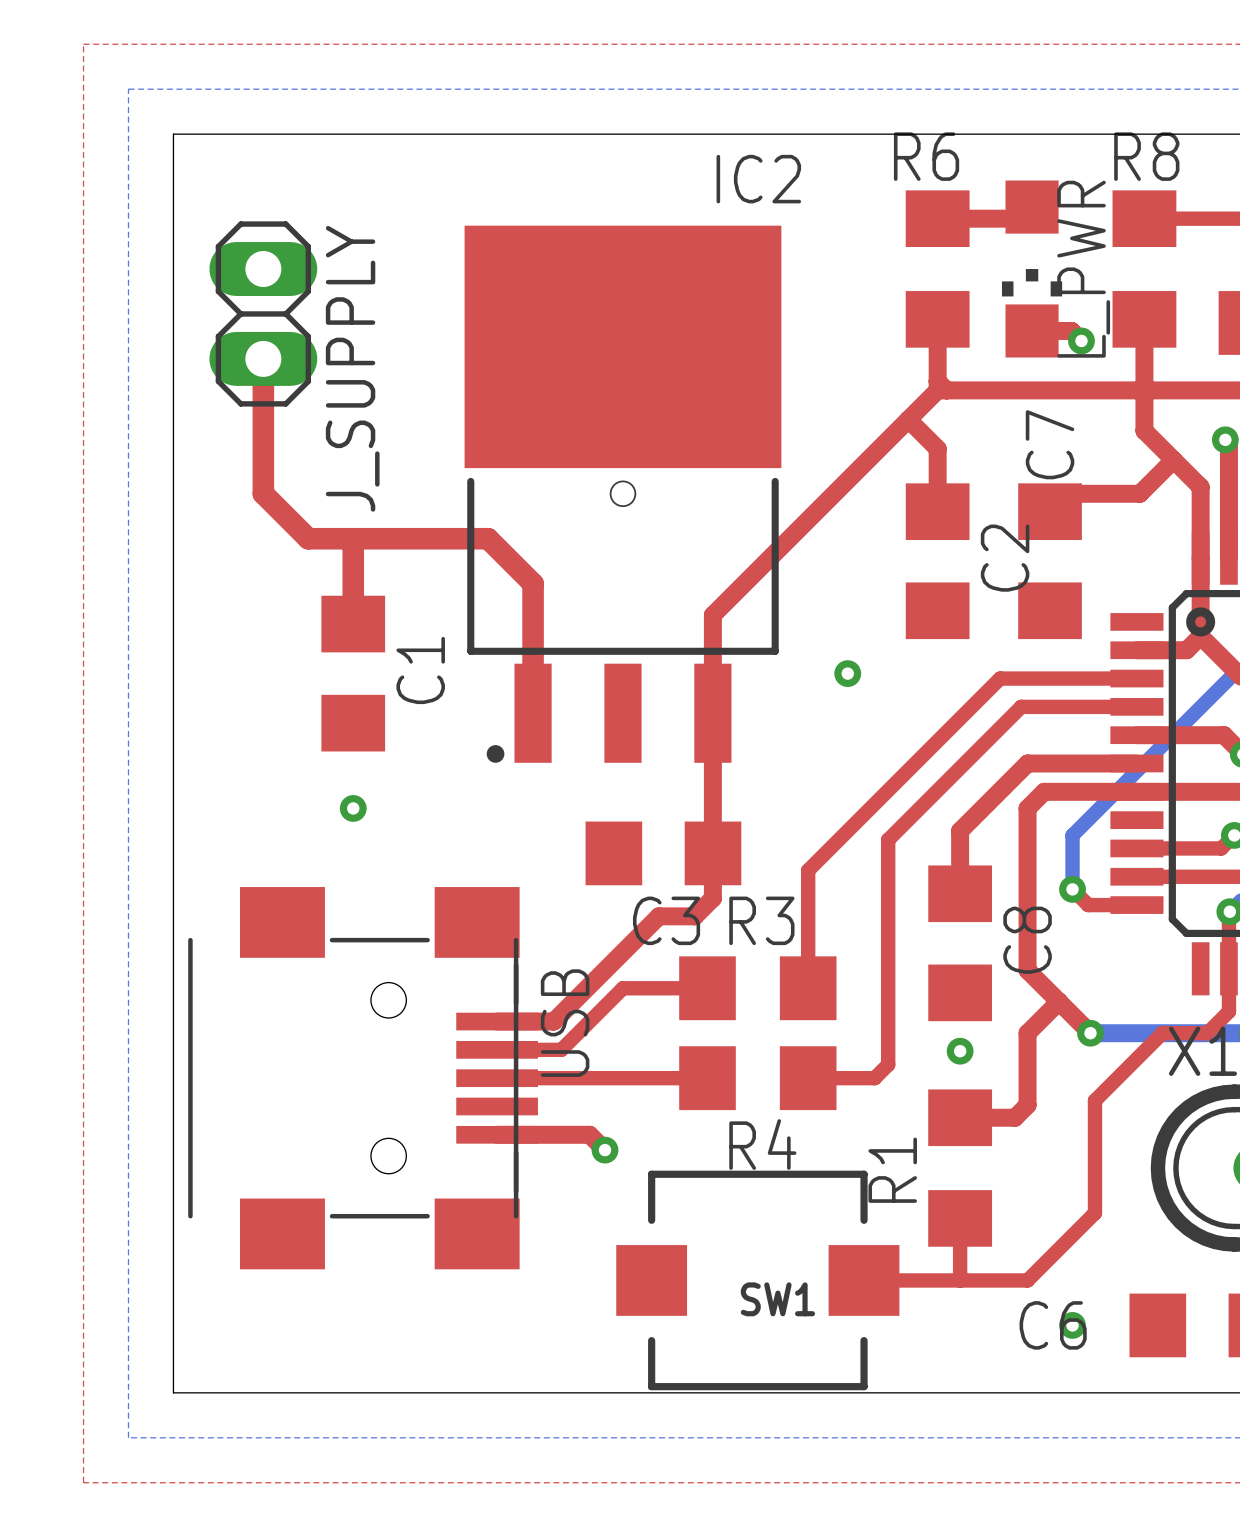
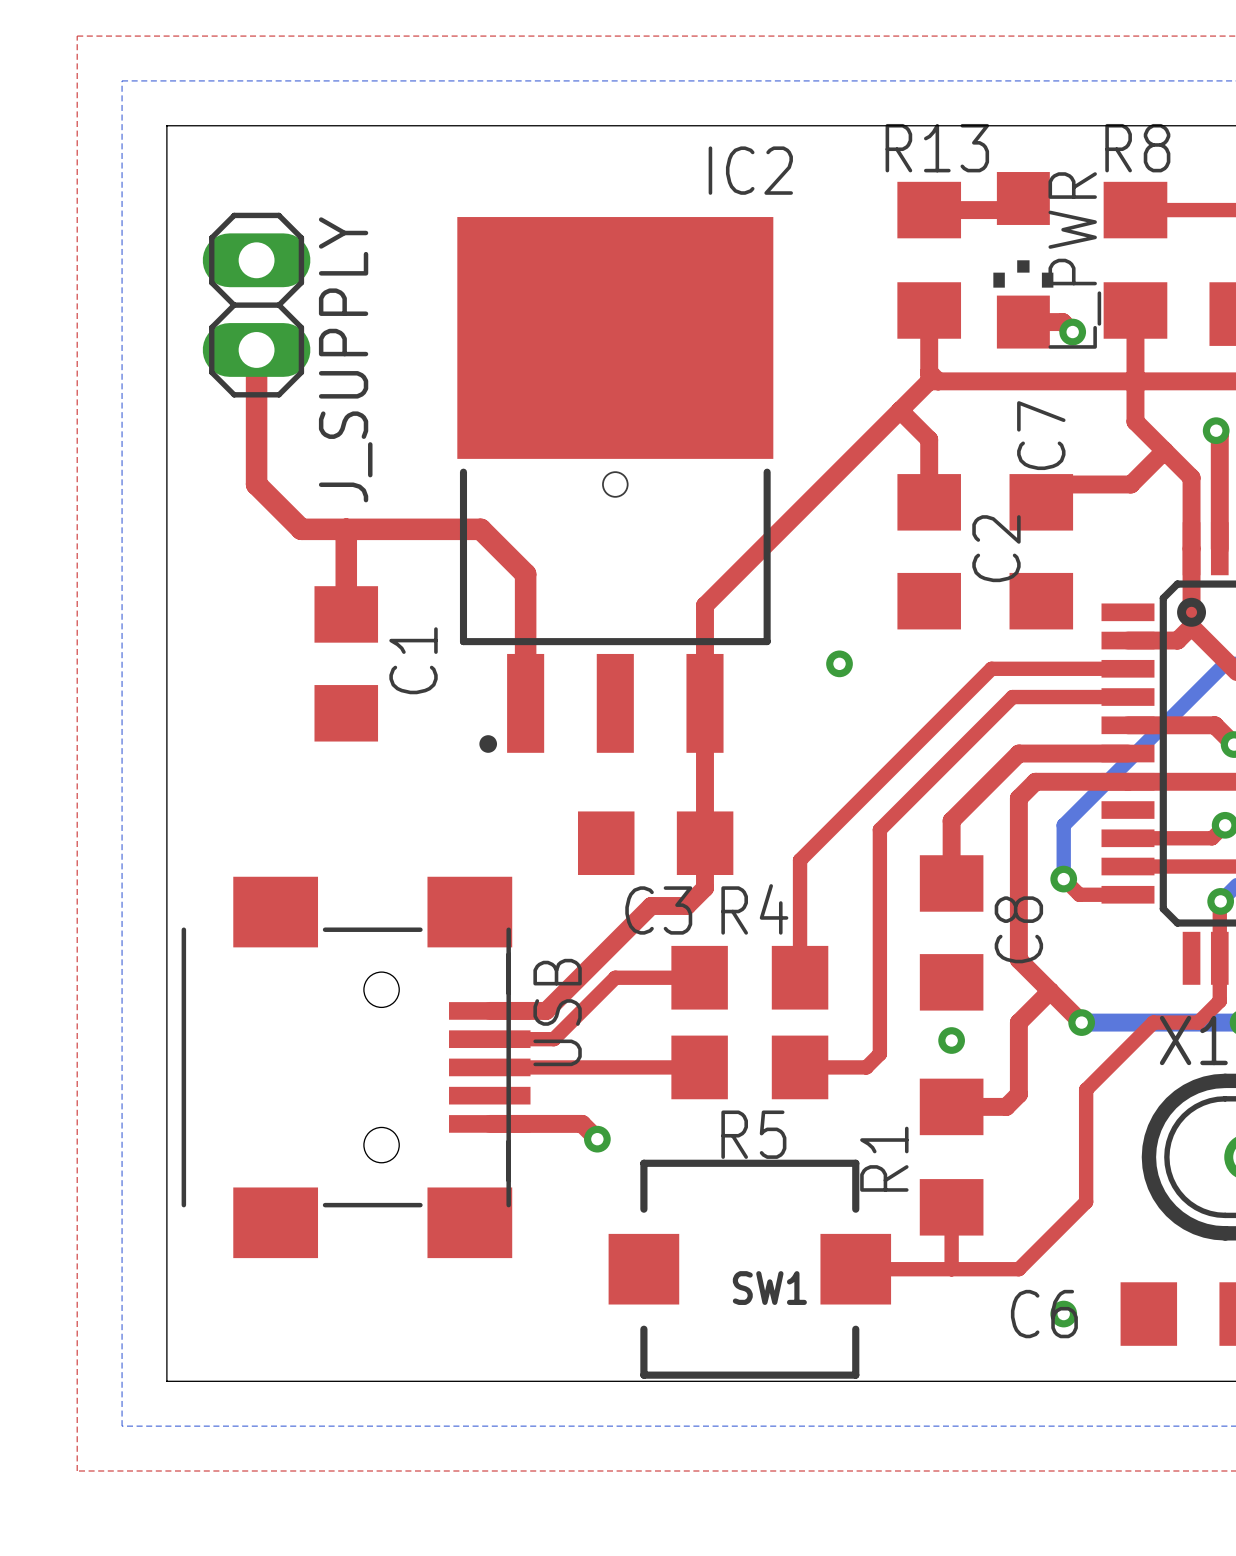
R6 name: R6 (926, 156) -> R13 (937, 148)
via: (353, 808) -> none
R3 name: R3 (761, 920) -> R4 (754, 909)
R4 name: R4 (762, 1144) -> R5 (753, 1134)

